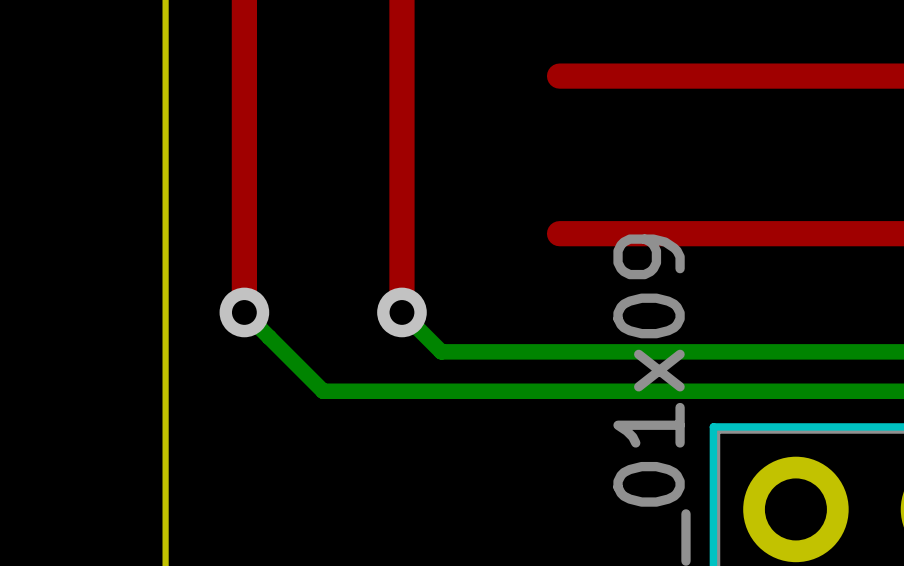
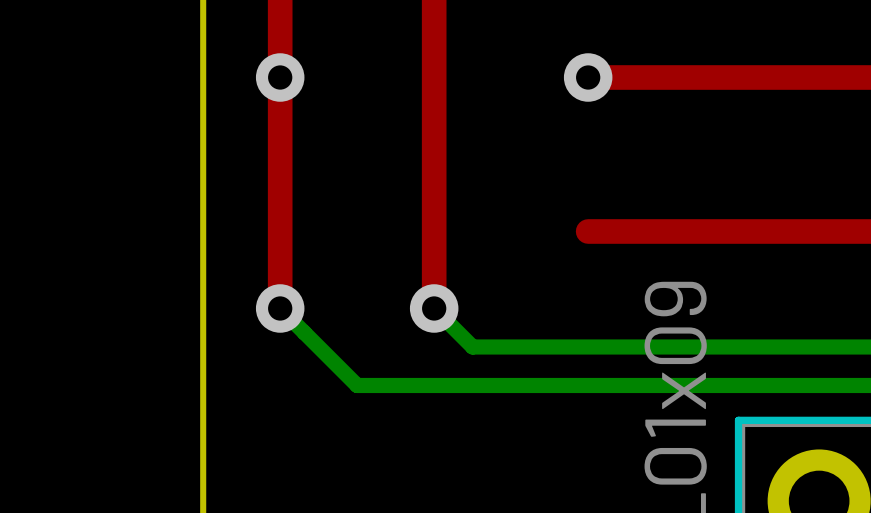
via: none -> (280, 77)
via: none -> (588, 77)

